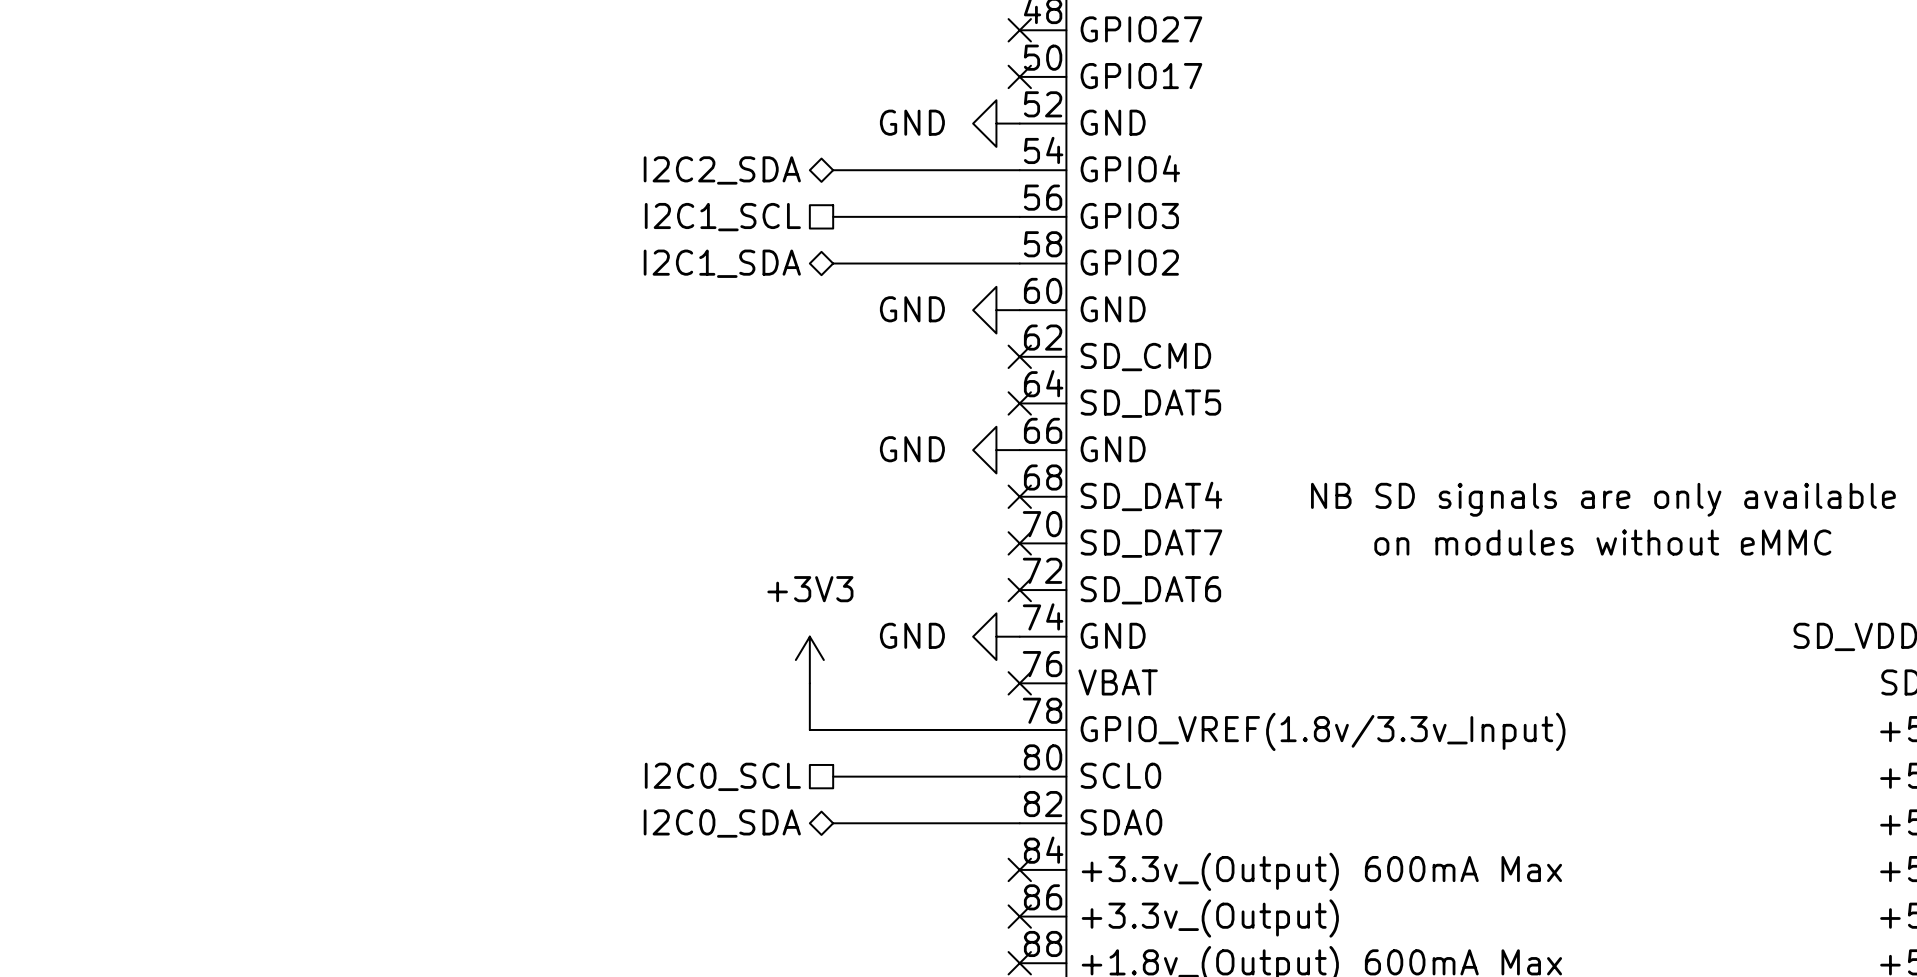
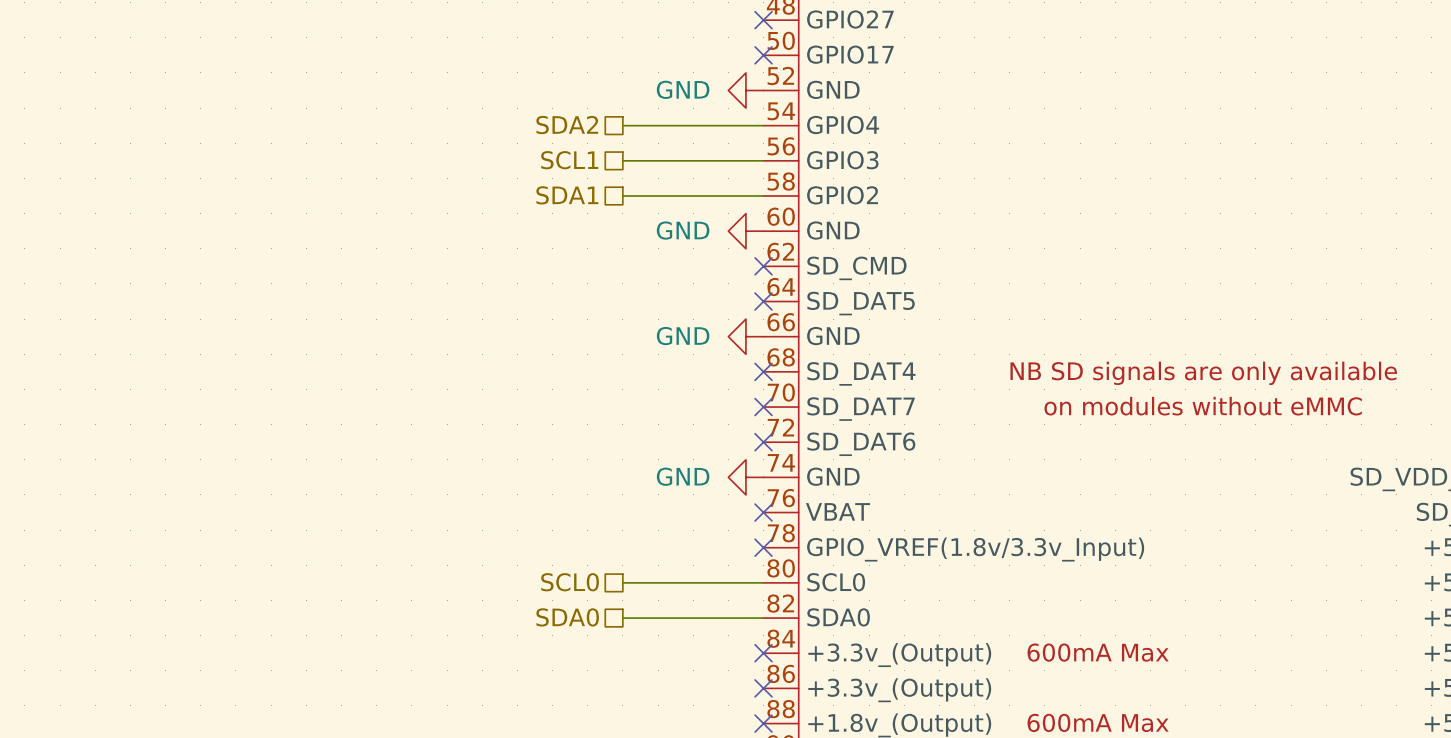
hierarchical label shape: bidirectional (722, 170) -> passive (567, 125)
hierarchical label: I2C2_SDA (722, 170) -> SDA2 (567, 125)
hierarchical label: I2C1_SCL (722, 217) -> SCL1 (569, 160)
hierarchical label shape: bidirectional (722, 263) -> passive (567, 195)
hierarchical label: I2C1_SDA (722, 263) -> SDA1 (567, 195)
power symbol: +3V3 (809, 660) -> none
wire: (809, 683) (809, 729) (1019, 729) -> none
no-connect mark: none -> (763, 547)
hierarchical label: I2C0_SCL (722, 776) -> SCL0 (570, 582)
hierarchical label shape: bidirectional (722, 823) -> passive (567, 617)
hierarchical label: I2C0_SDA (722, 823) -> SDA0 (567, 617)

